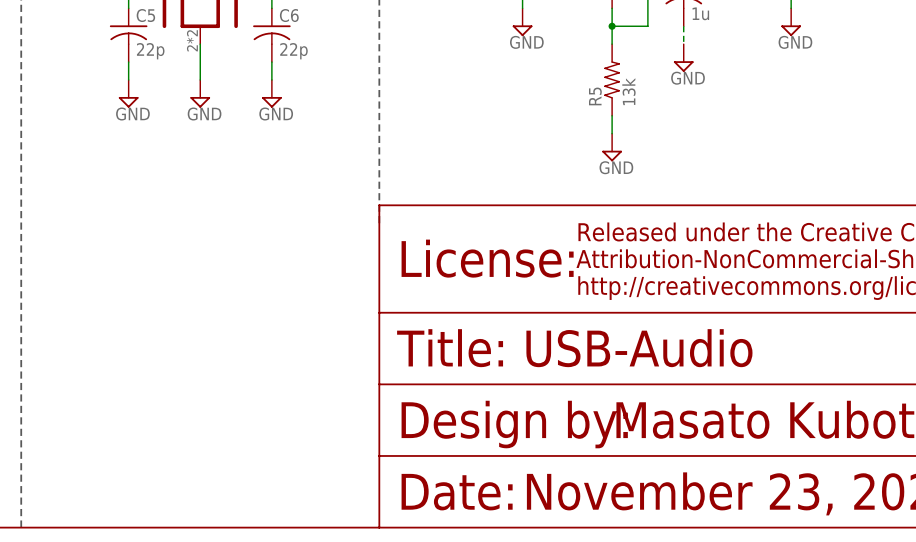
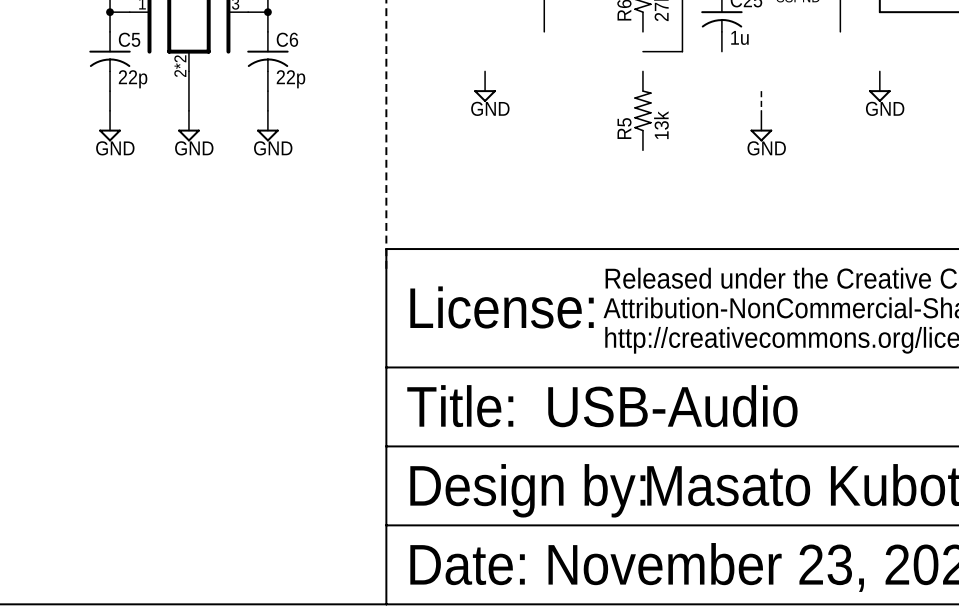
wire: (612, 8) (612, 44) -> none
power symbol position: GND (522, 22) -> GND (485, 86)
power symbol: GND (791, 22) -> none
junction: (612, 26) -> none
wire: (683, 26) (683, 44) -> (761, 91) (761, 110)
power symbol: GND (683, 58) -> none
power symbol: none -> GND (879, 86)
power symbol: none -> GND (761, 126)
wire: (612, 115) (612, 133) -> none
power symbol: GND (612, 147) -> none

